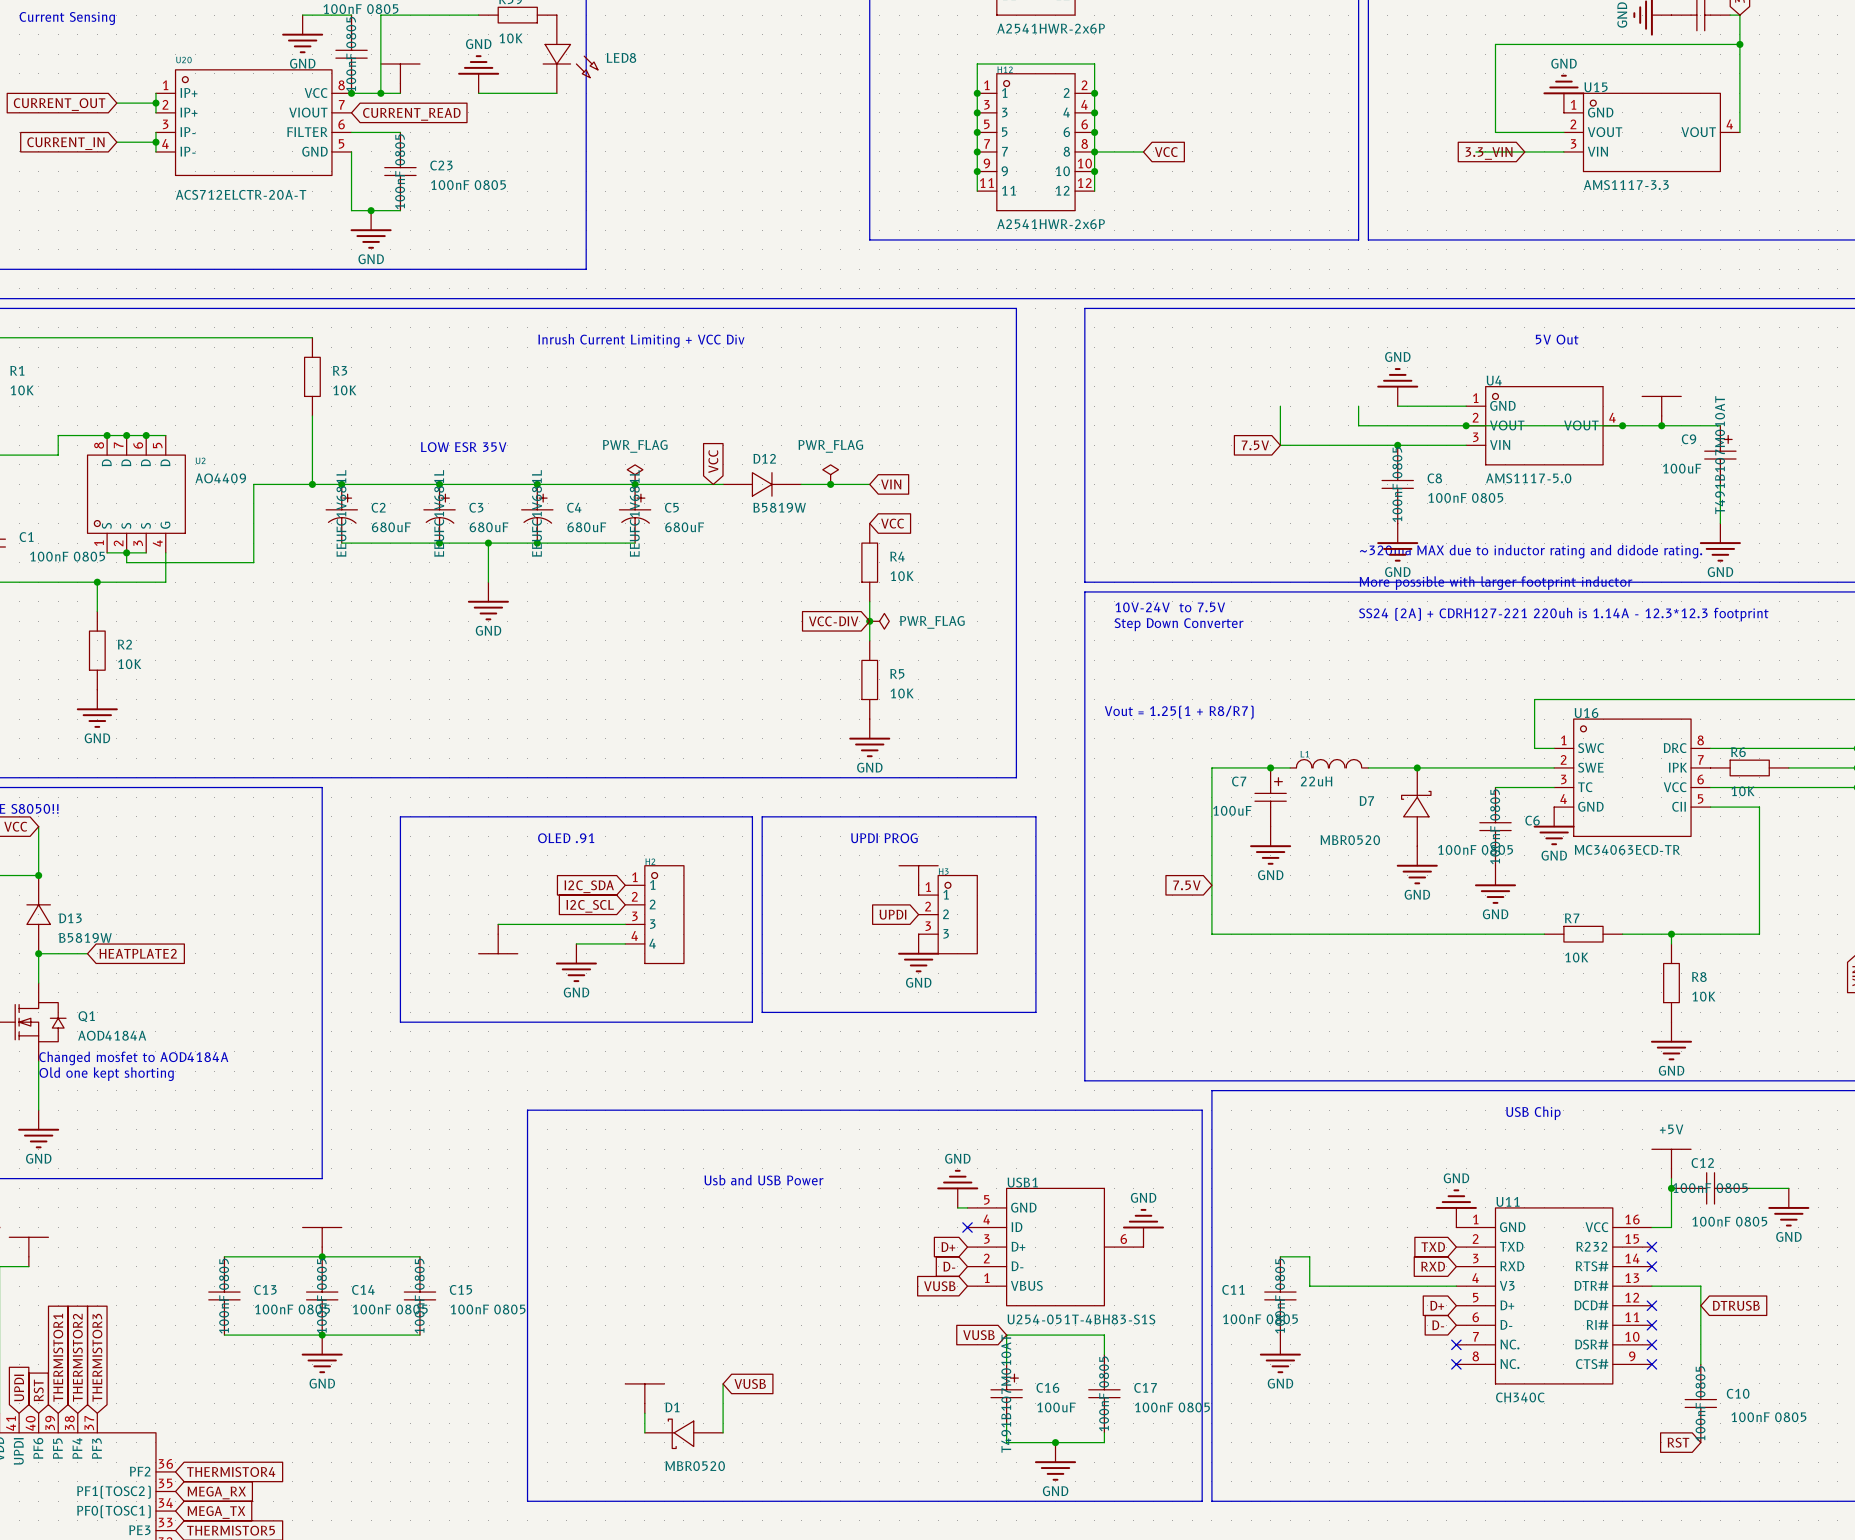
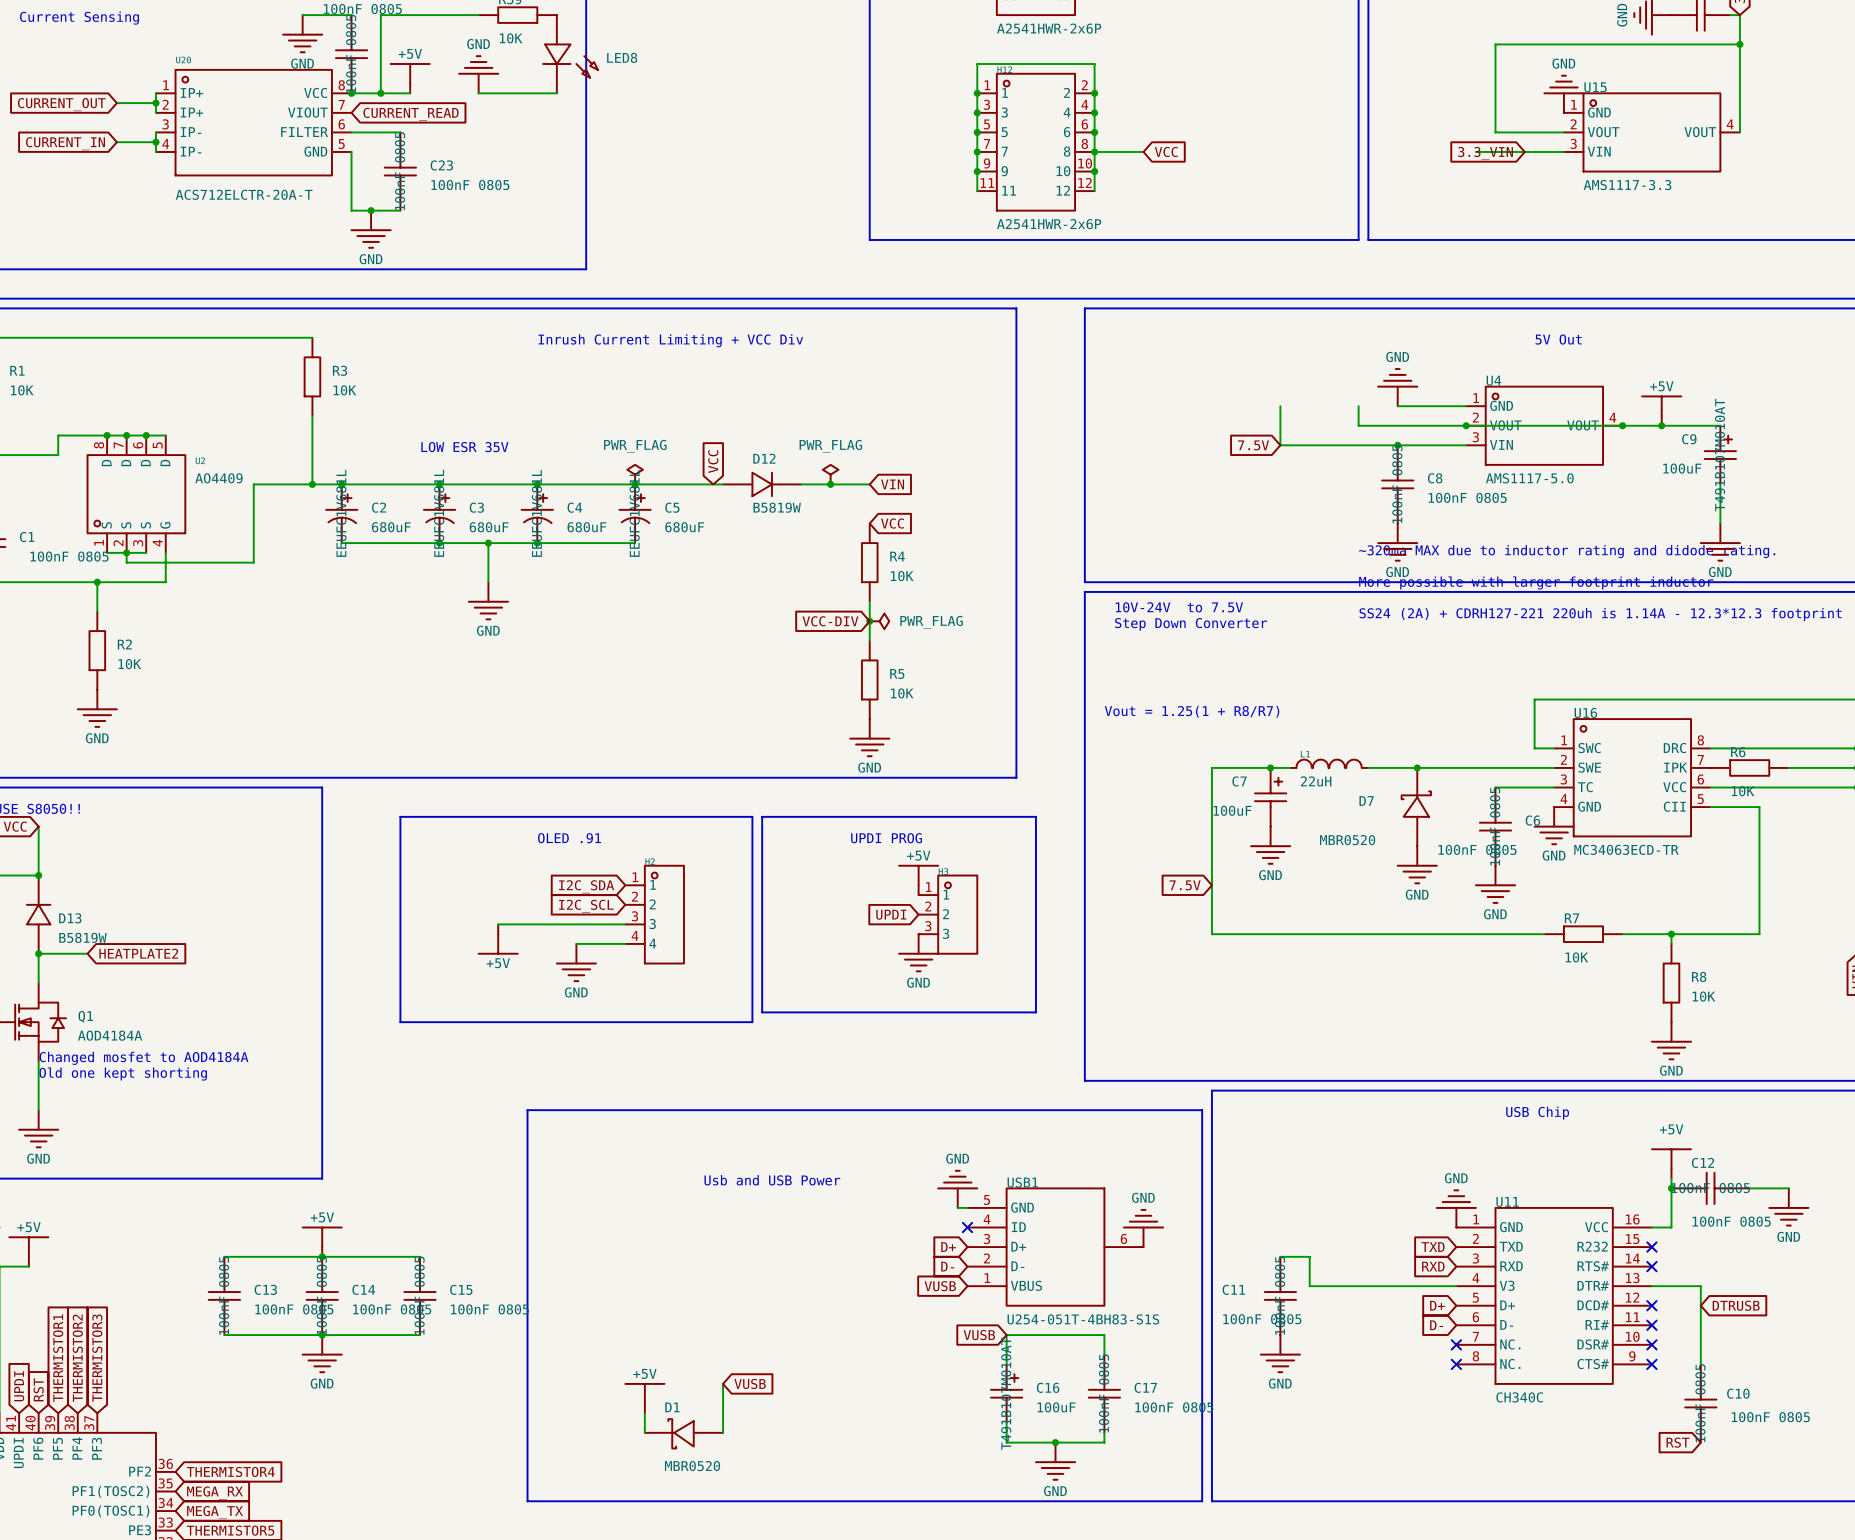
power symbol: (400, 78) -> none
power symbol: none -> +5V (410, 78)
wire: none -> (400, 93) (410, 93)
power symbol text: none -> +5V (1661, 386)
power symbol text: none -> +5V (918, 855)
power symbol text: none -> +5V (498, 963)
power symbol text: none -> +5V (322, 1217)
power symbol text: none -> +5V (28, 1227)
power symbol text: none -> +5V (644, 1373)

